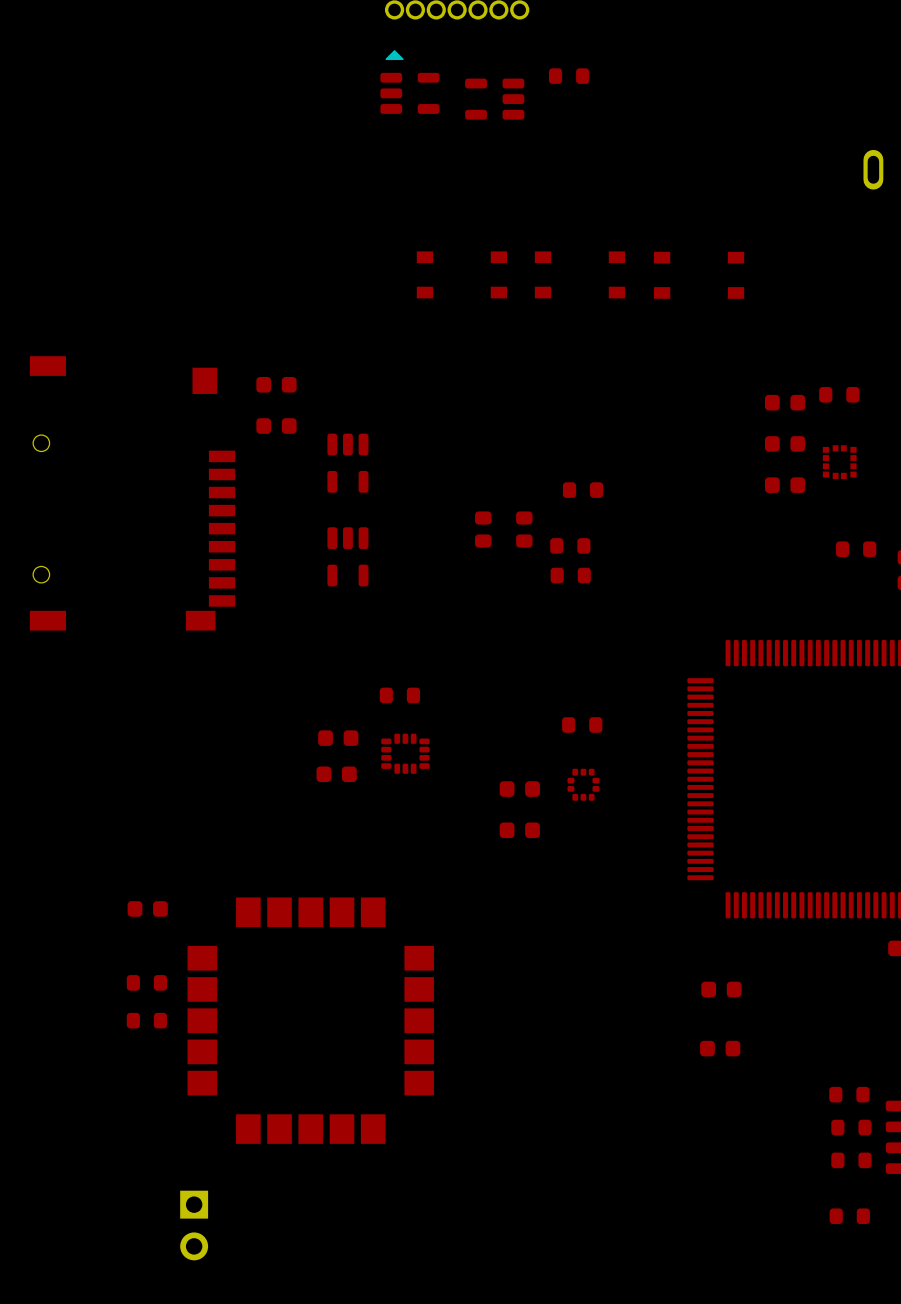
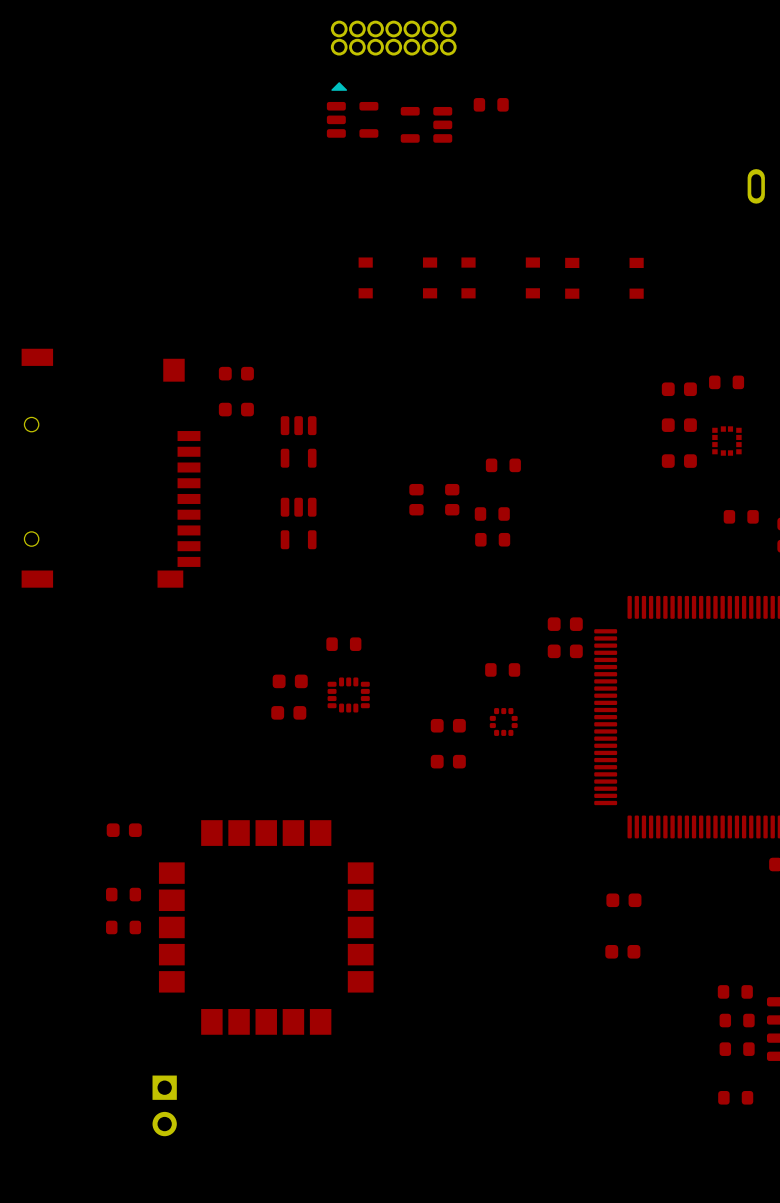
part: none -> (565, 624)
part: none -> (565, 651)

